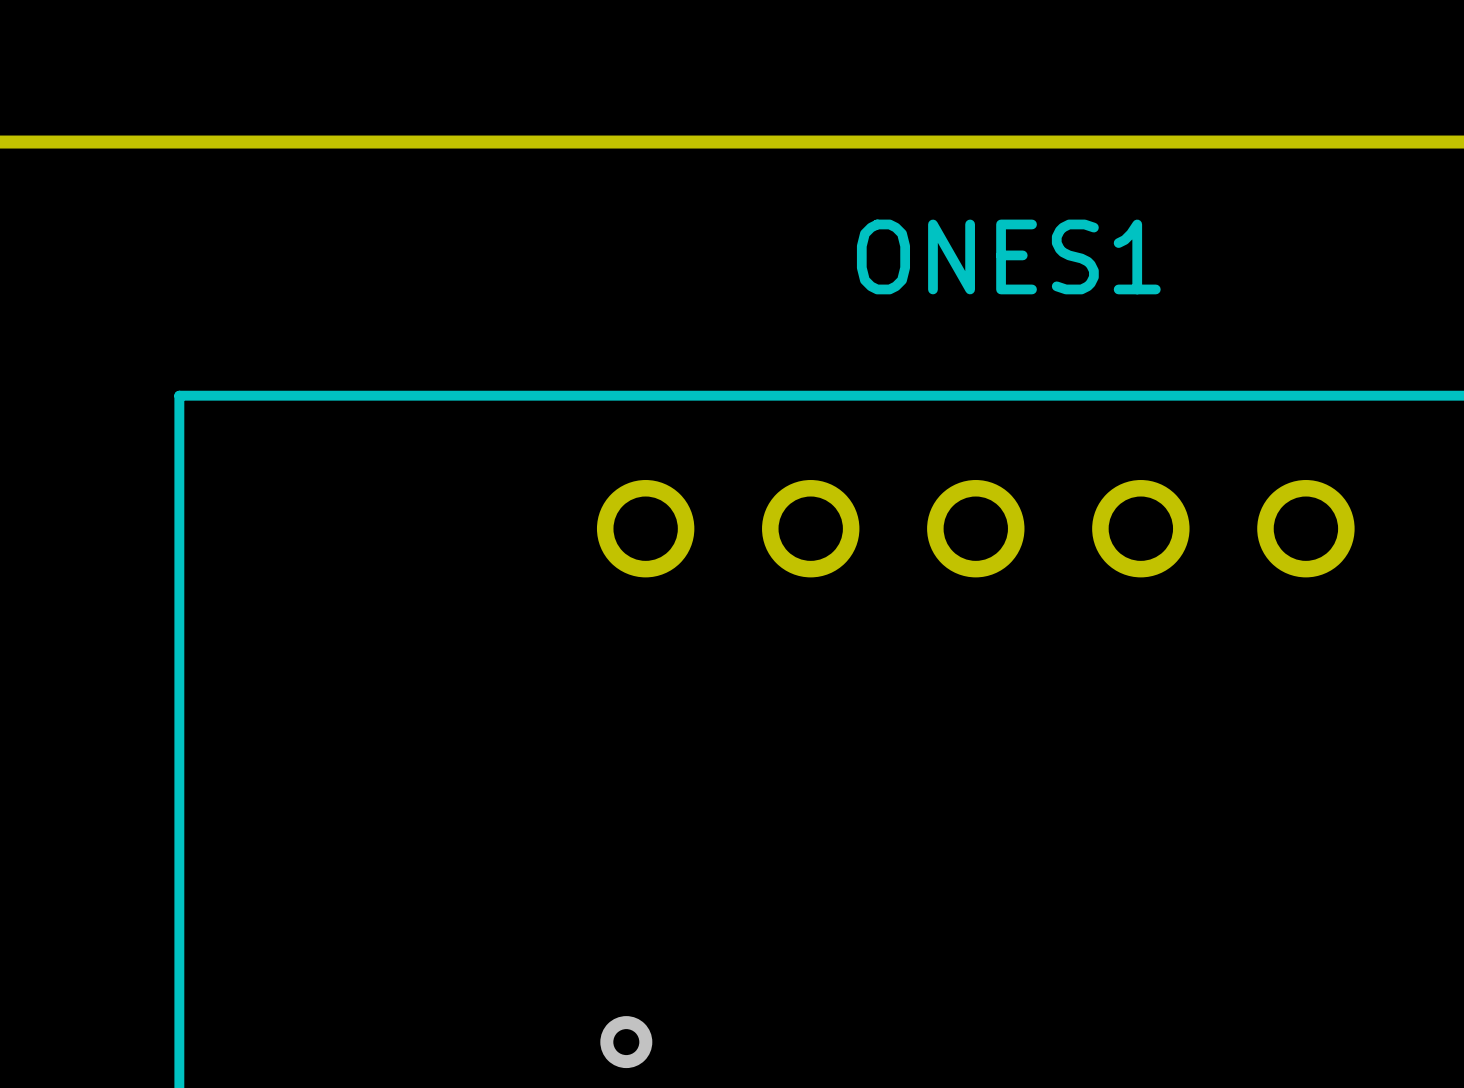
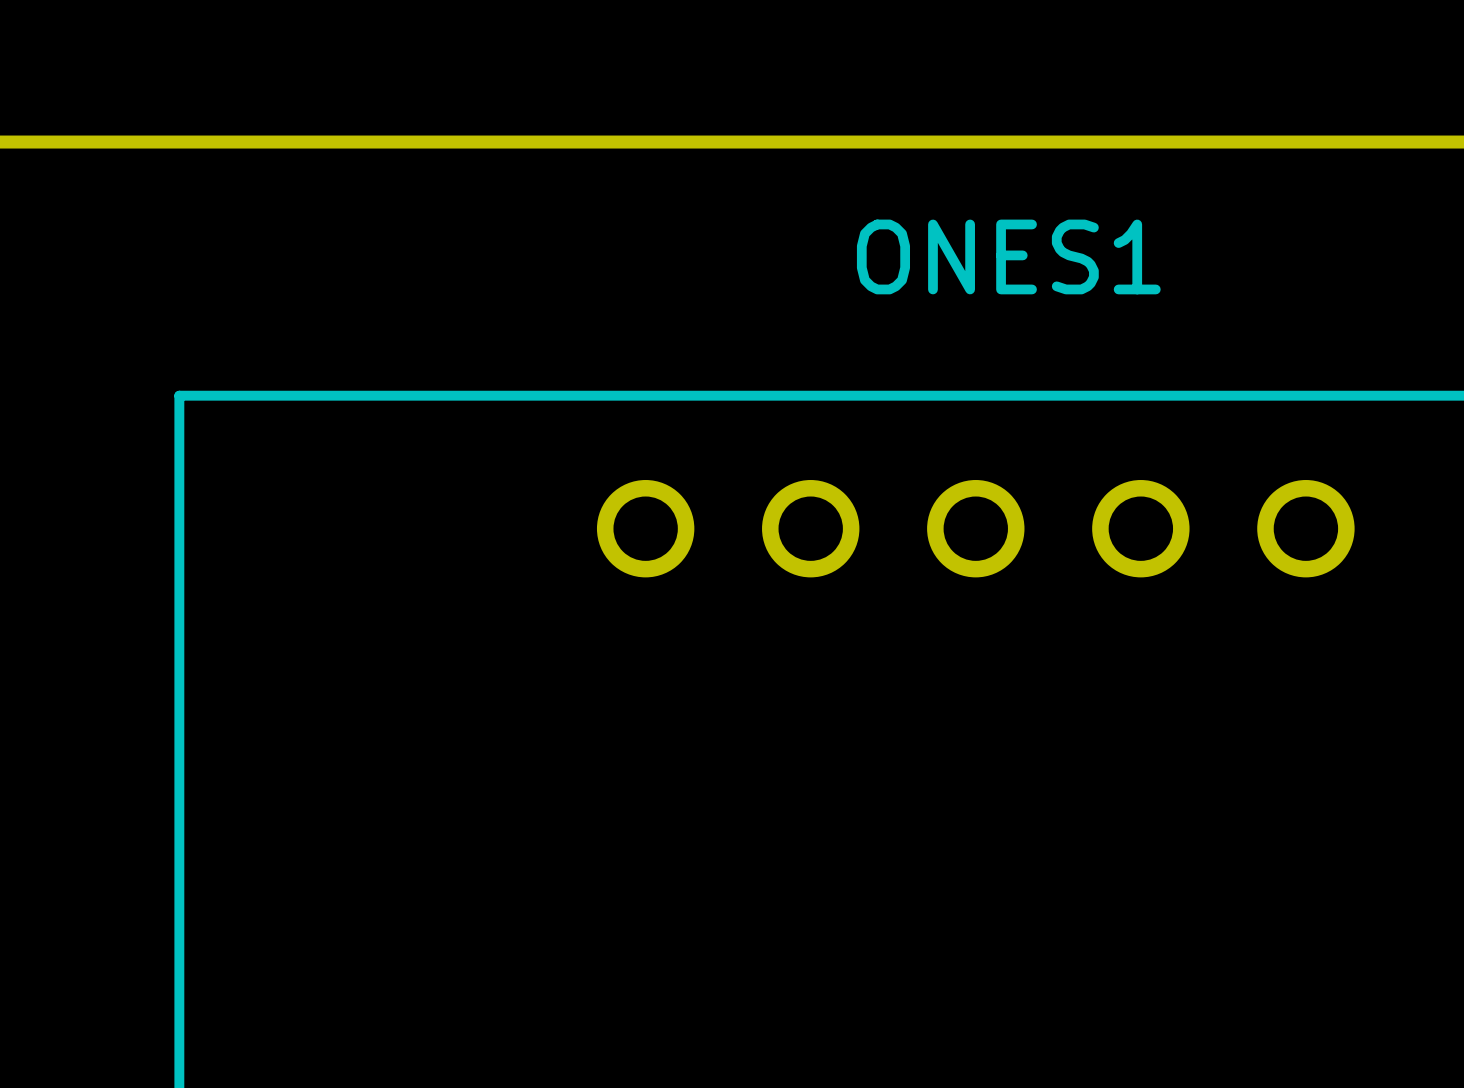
via: (626, 1042) -> none

